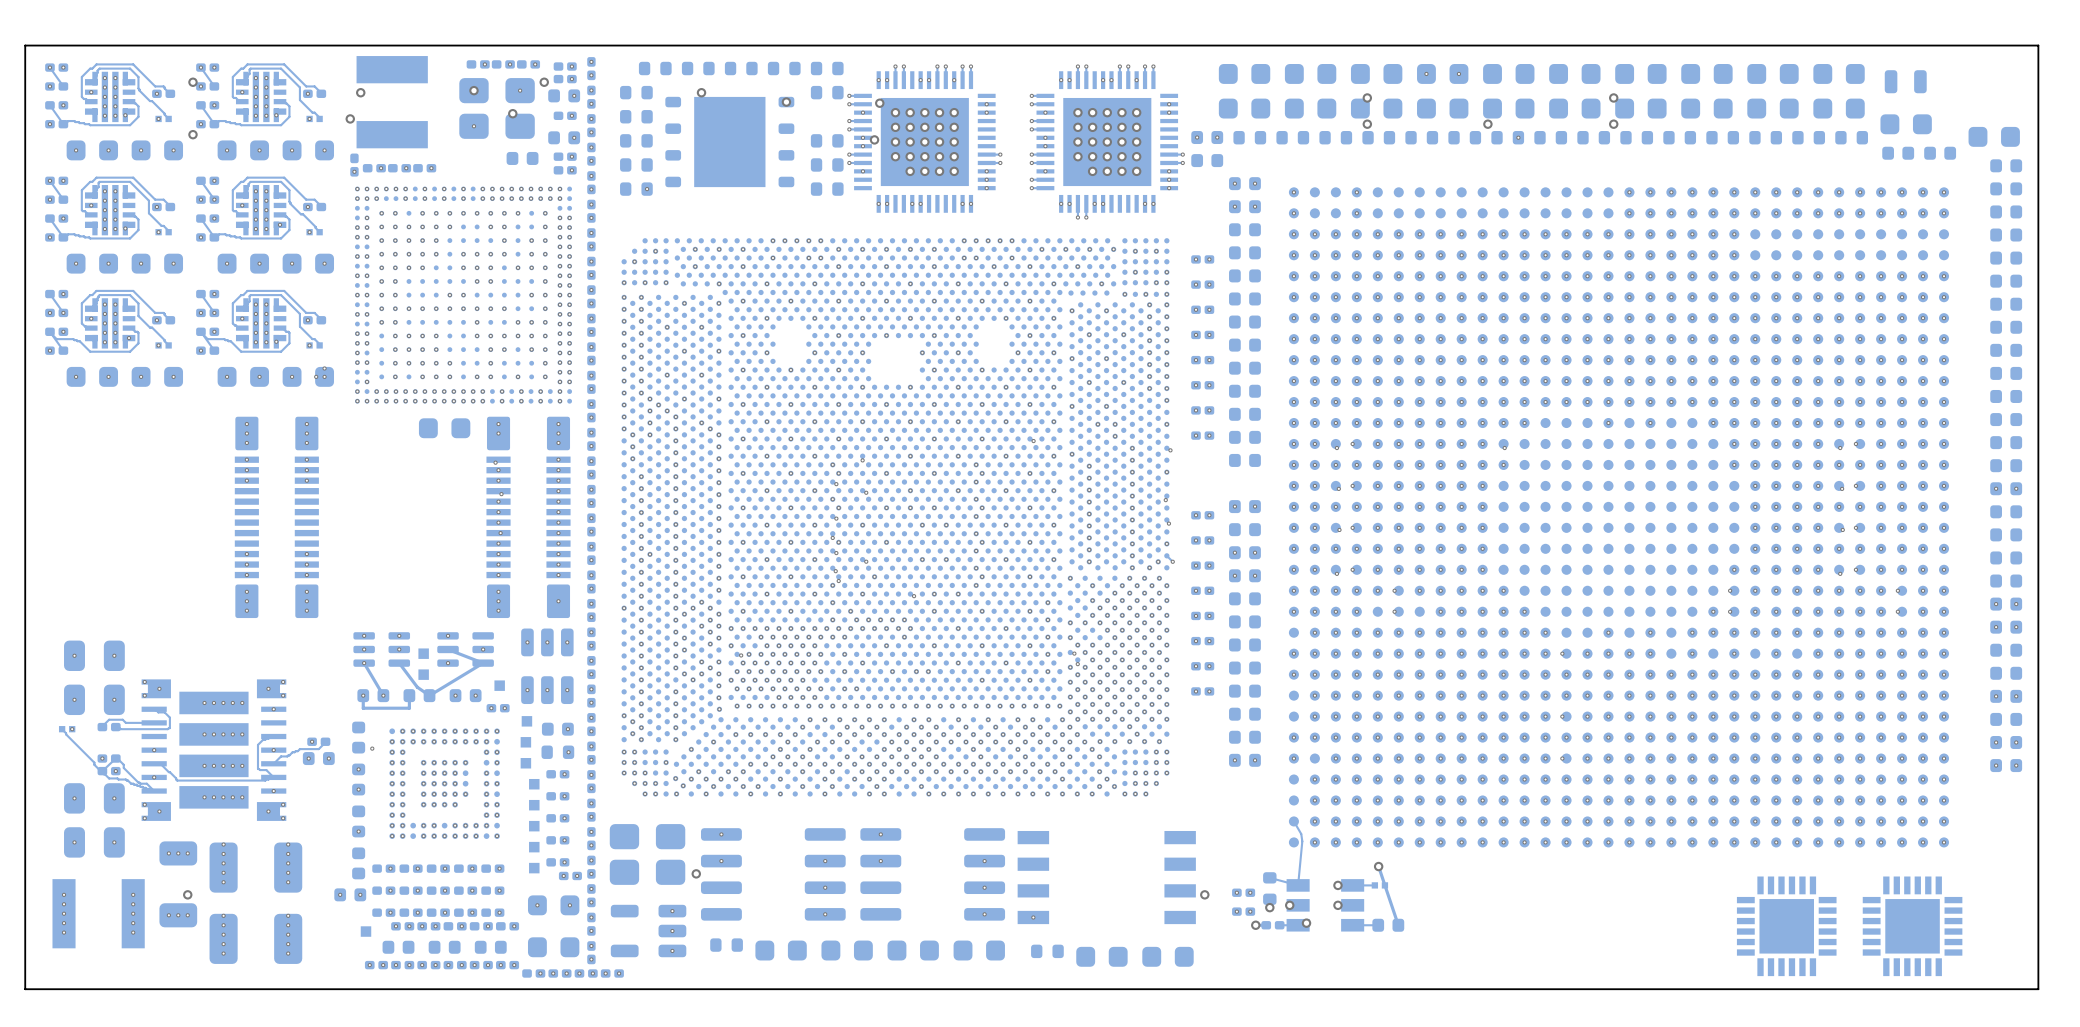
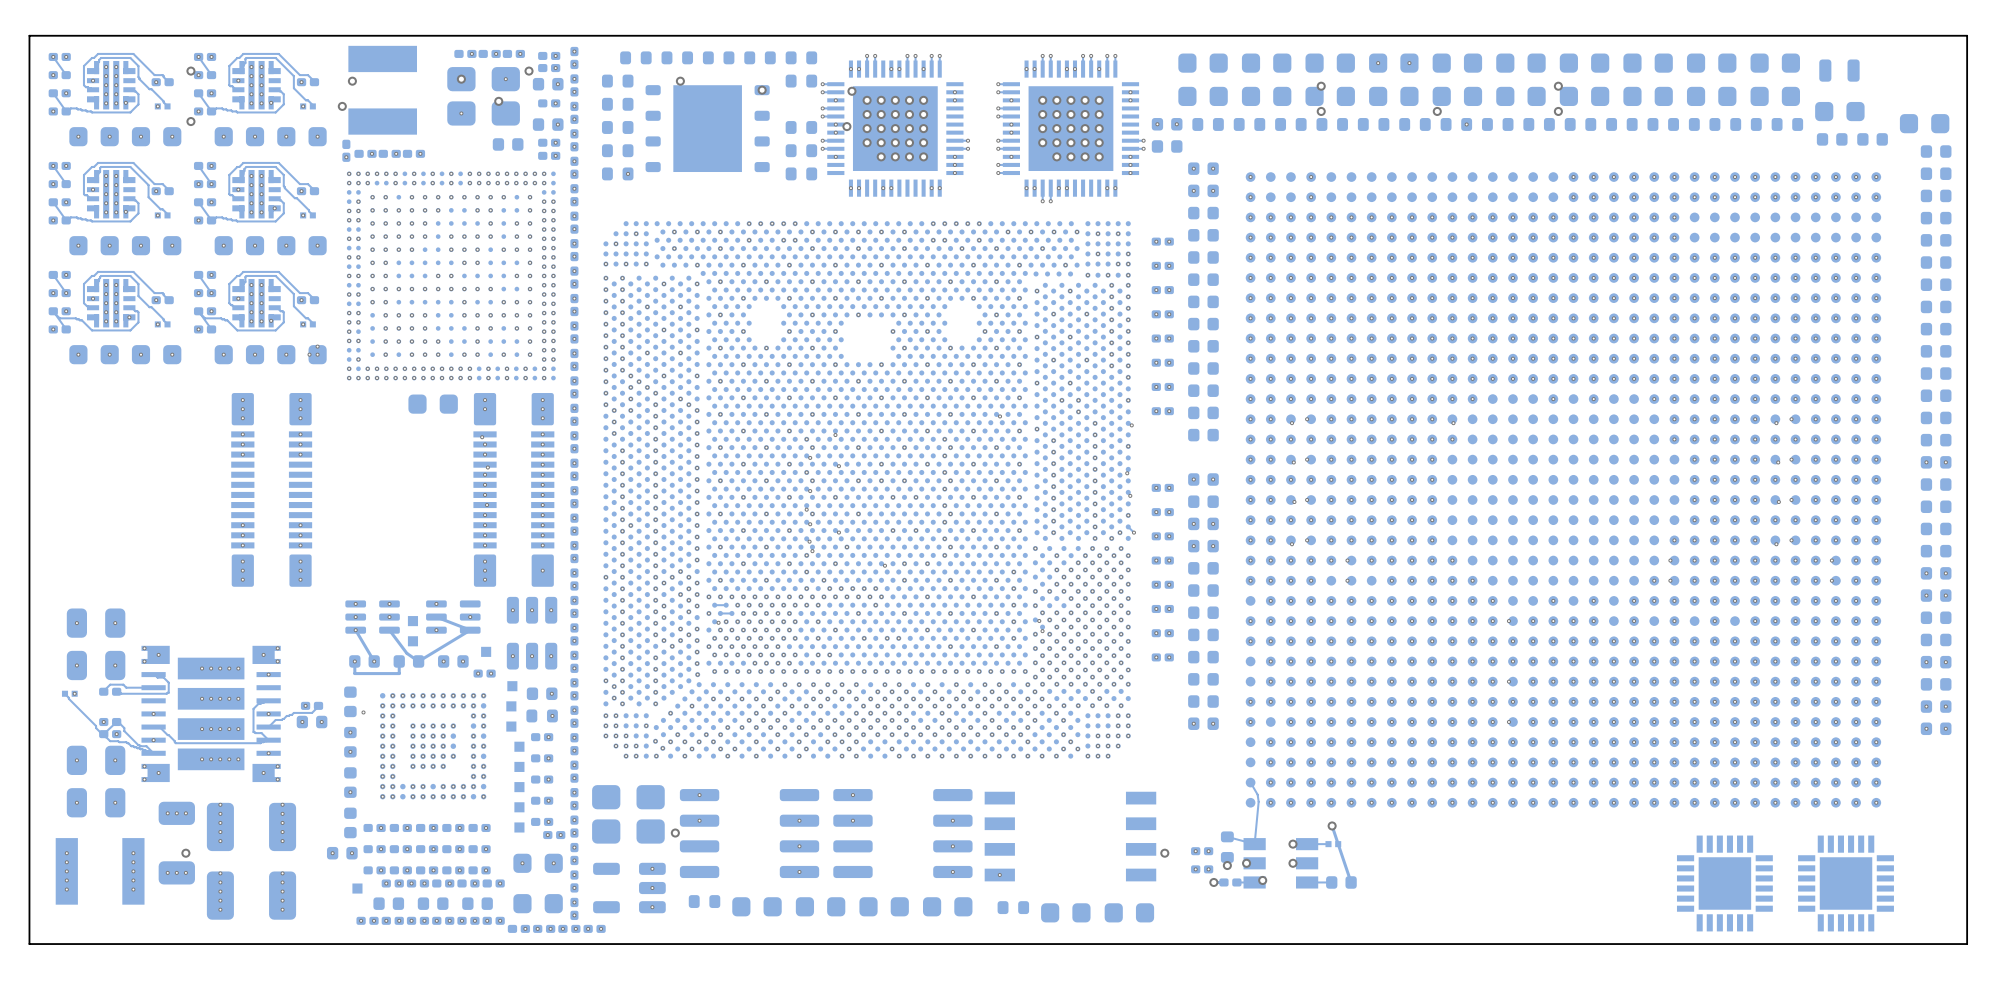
track: none -> (726, 605) (714, 605)
track: none -> (731, 613) (720, 613)

